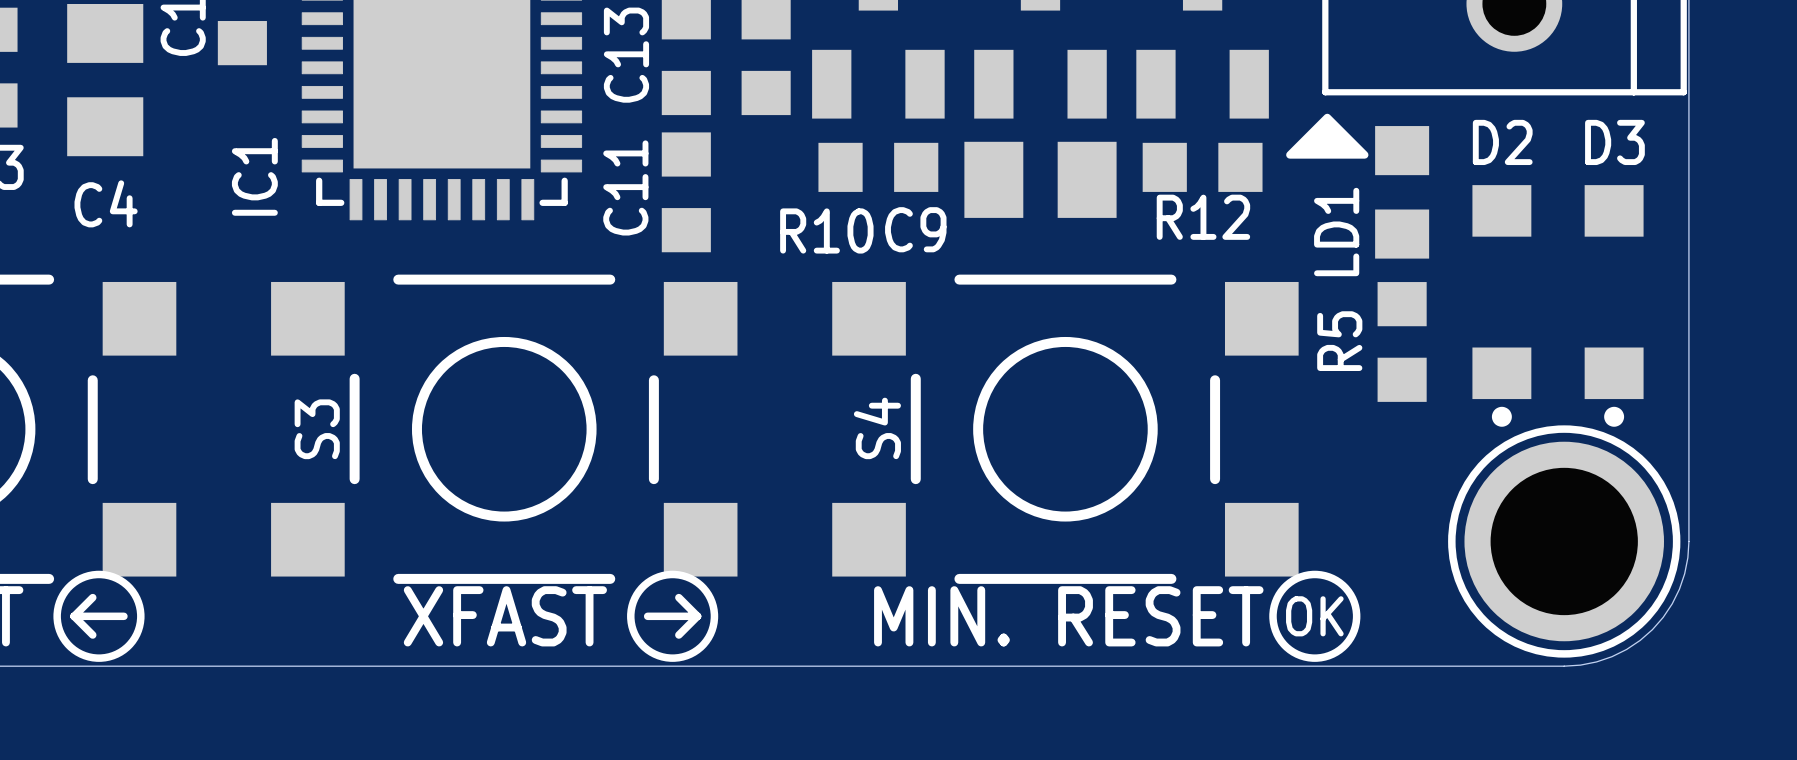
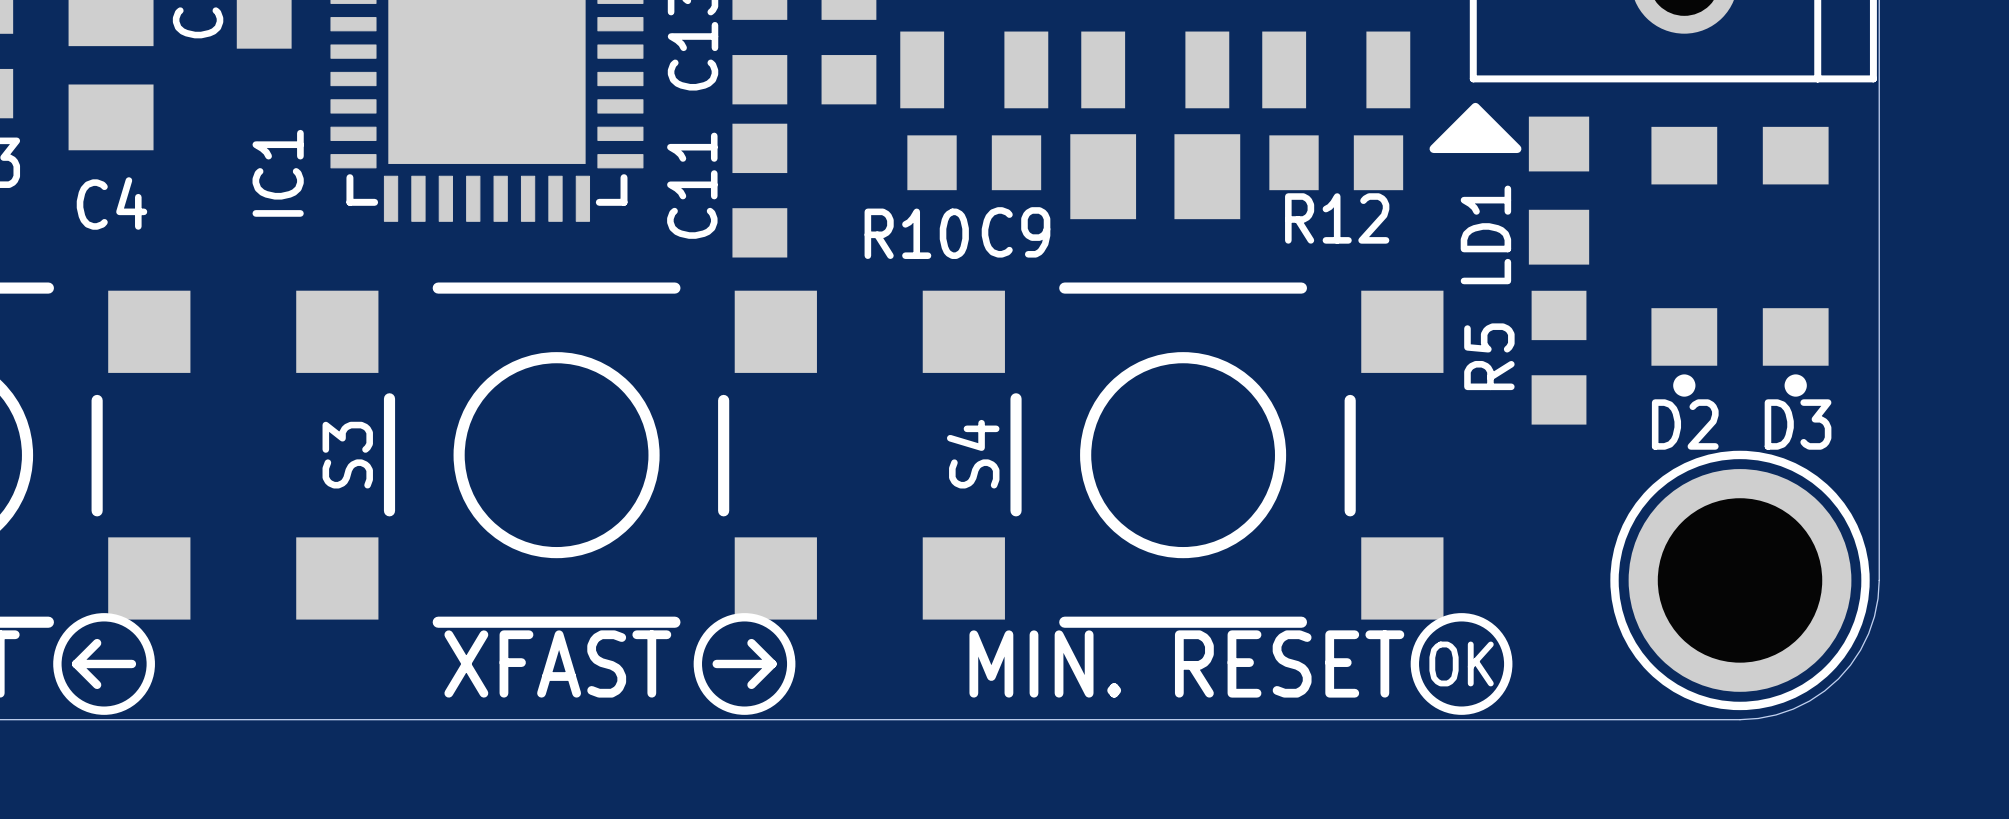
D2 name position: D2 (1502, 142) -> D2 (1685, 424)
D3 name position: D3 (1614, 142) -> D3 (1798, 424)
D2 position: (1501, 305) -> (1684, 261)
D3 position: (1614, 305) -> (1795, 261)

